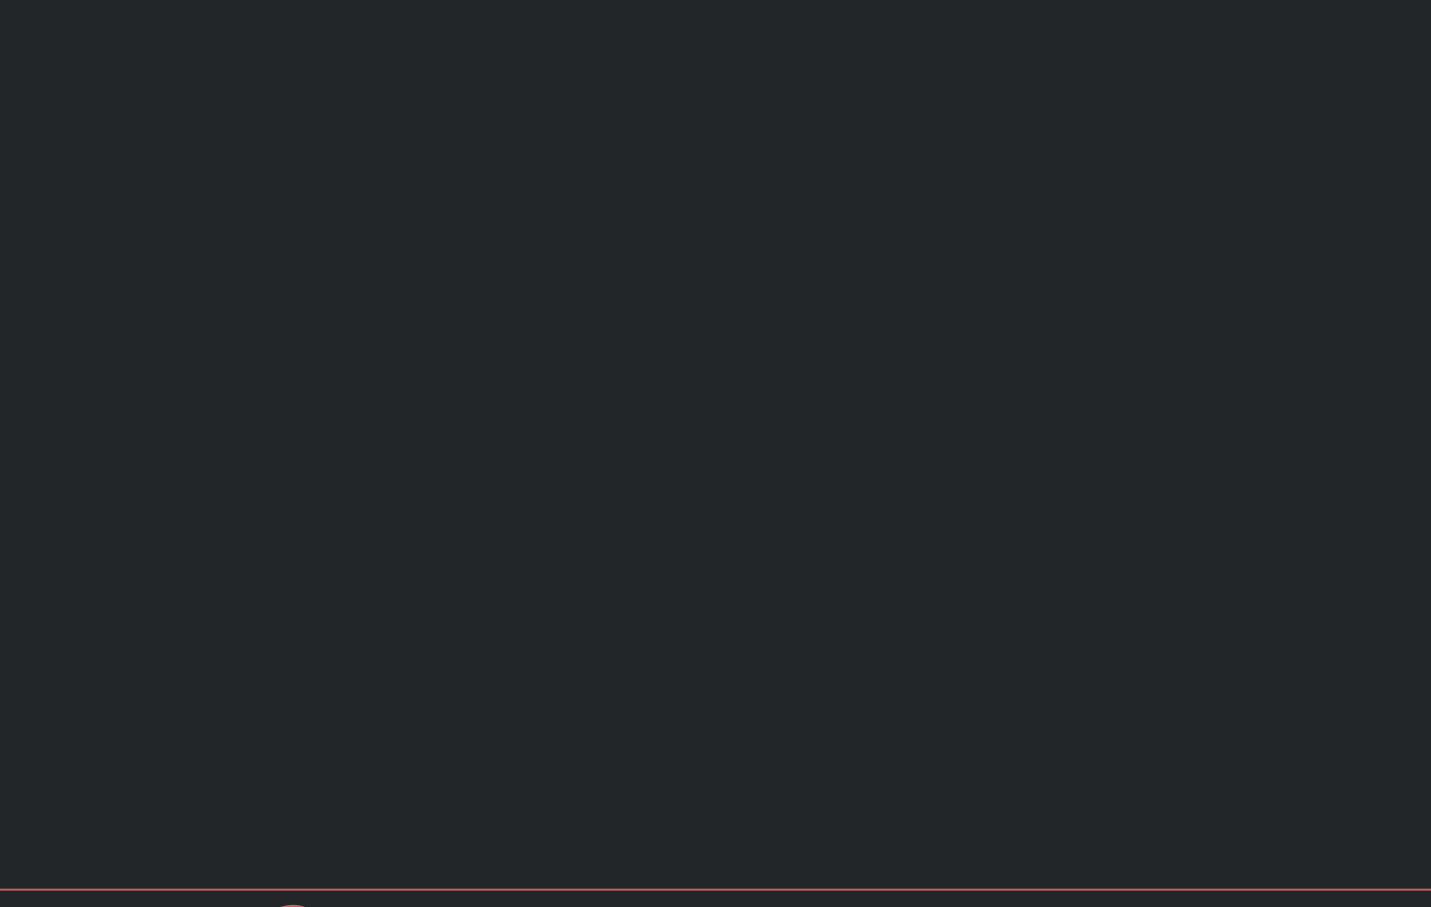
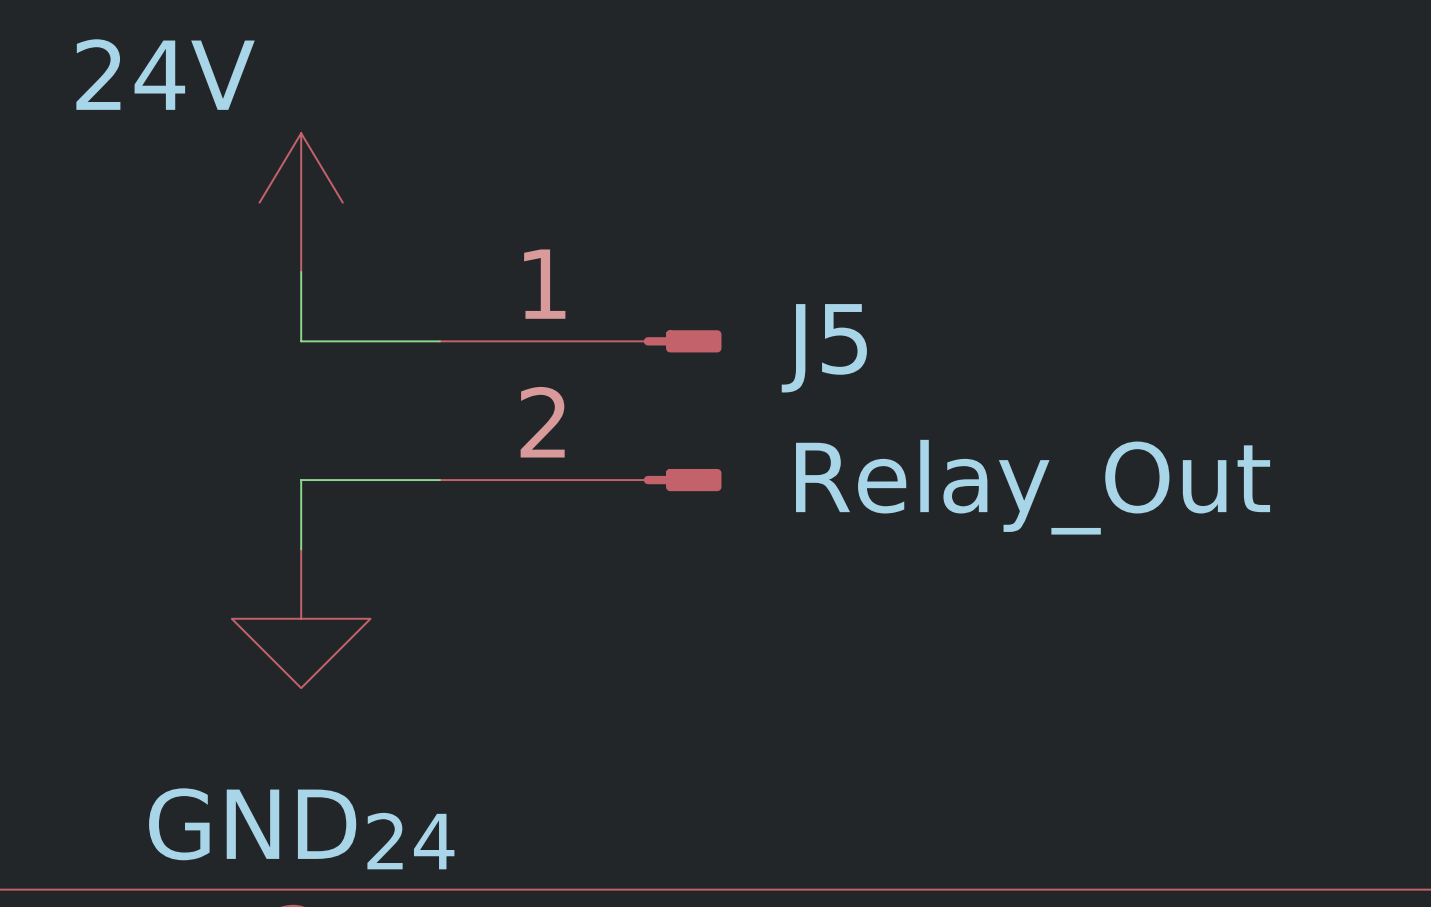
power symbol: none -> 24V (301, 202)
wire: none -> (301, 271) (301, 341) (439, 341)
J5: none -> Relay_Out (580, 410)
wire: none -> (439, 480) (301, 480) (301, 549)
power symbol: none -> GND24 (301, 618)

